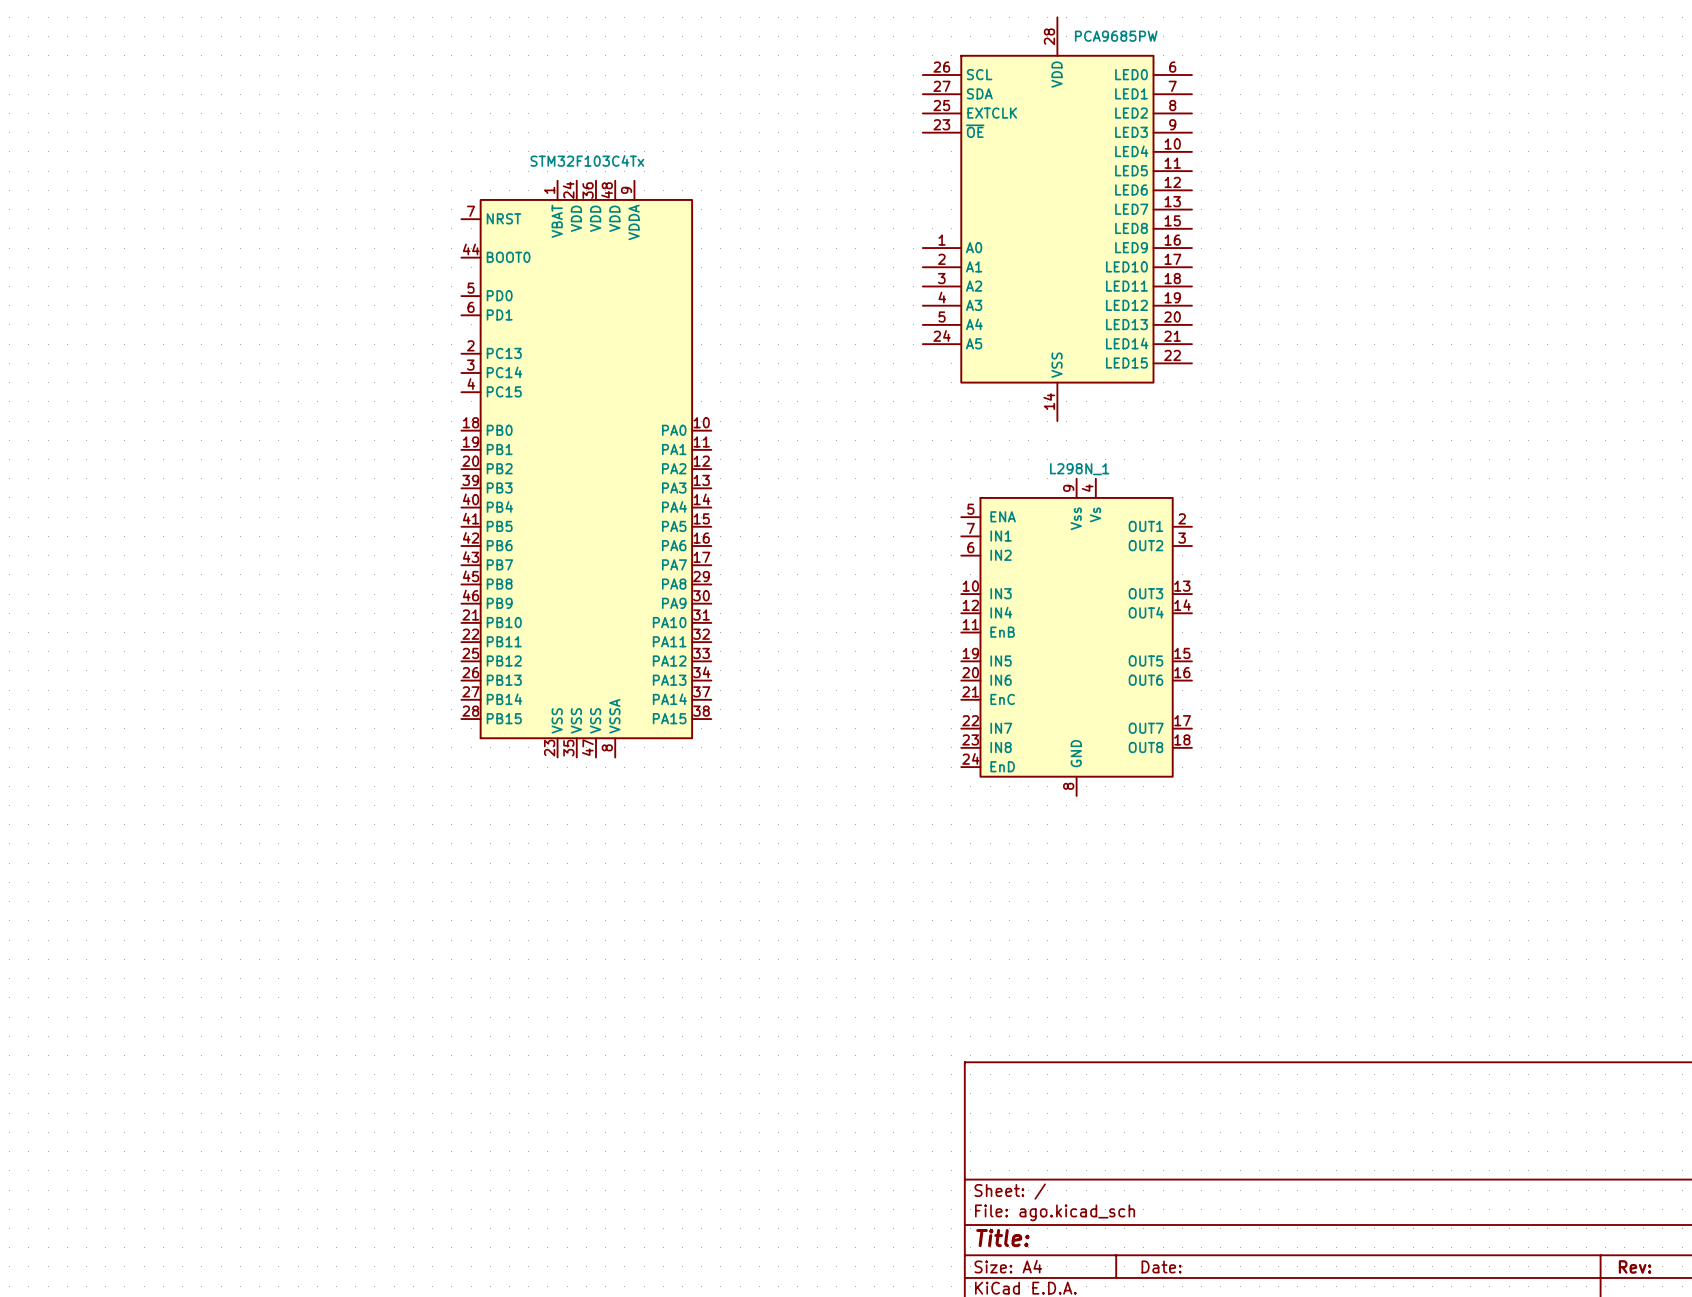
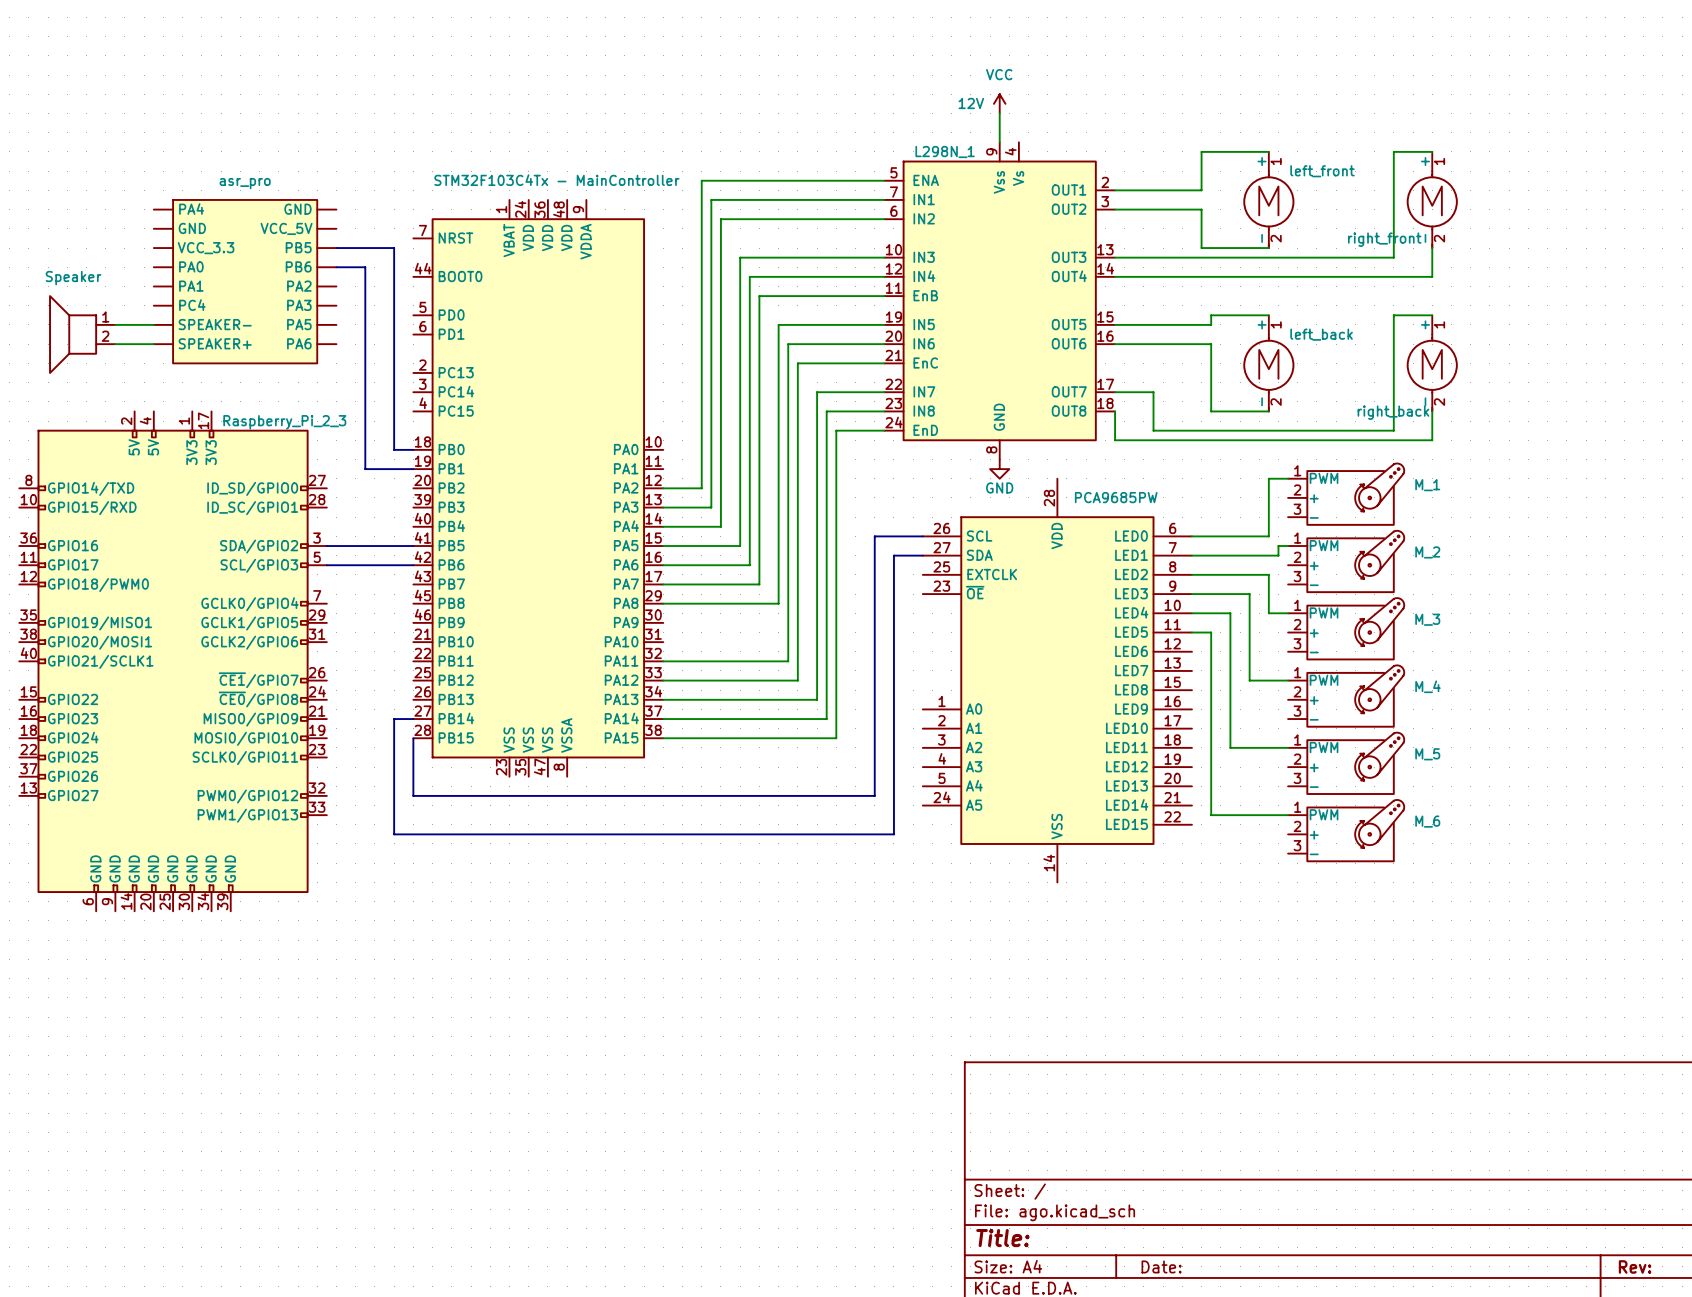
12V: none -> VCC (999, 103)
wire: none -> (1268, 151) (1201, 151) (1201, 190) (1115, 190)
wire: none -> (1432, 151) (1393, 151) (1393, 257) (1115, 257)
wire: none -> (884, 180) (701, 180) (701, 488) (663, 488)
wire: none -> (884, 199) (711, 199) (711, 507) (663, 507)
left_front: none -> (1268, 199)
right_front: none -> (1432, 199)
wire: none -> (1115, 209) (1201, 209) (1201, 248) (1268, 248)
wire: none -> (884, 219) (720, 219) (720, 526) (663, 526)
part: PCA9685PW (1057, 219) -> none
bus: none -> (336, 248) (394, 248) (394, 449) (413, 449)
wire: none -> (1432, 248) (1432, 276) (1115, 276)
wire: none -> (884, 257) (740, 257) (740, 546) (663, 546)
bus: none -> (336, 267) (365, 267) (365, 469) (413, 469)
wire: none -> (884, 276) (749, 276) (749, 565) (663, 565)
part: none -> asr_pro (245, 281)
wire: none -> (884, 296) (759, 296) (759, 584) (663, 584)
part: none -> L298N_1 (999, 300)
wire: none -> (1268, 315) (1211, 315) (1211, 324) (1115, 324)
wire: none -> (1432, 315) (1393, 315) (1393, 430) (1153, 430) (1153, 392) (1115, 392)
wire: none -> (115, 324) (153, 324)
wire: none -> (884, 324) (778, 324) (778, 603) (663, 603)
part: none -> Speaker (82, 334)
wire: none -> (115, 344) (153, 344)
wire: none -> (884, 344) (788, 344) (788, 661) (663, 661)
wire: none -> (1115, 344) (1211, 344) (1211, 411) (1268, 411)
wire: none -> (884, 363) (797, 363) (797, 680) (663, 680)
left_back: none -> (1268, 363)
right_back: none -> (1432, 363)
wire: none -> (884, 392) (817, 392) (817, 699) (663, 699)
wire: none -> (884, 411) (826, 411) (826, 719) (663, 719)
wire: none -> (1115, 411) (1115, 440) (1432, 440) (1432, 411)
wire: none -> (884, 430) (836, 430) (836, 738) (663, 738)
part: STM32F103C4Tx (586, 469) -> none
power symbol: none -> GND (999, 469)
wire: none -> (1288, 478) (1268, 478) (1268, 536) (1191, 536)
part: none -> STM32F103C4Tx - MainController (538, 488)
M_1: none -> (1346, 494)
bus: none -> (922, 536) (874, 536) (874, 795) (413, 795) (413, 738)
bus: none -> (326, 546) (413, 546)
wire: none -> (1288, 546) (1278, 546) (1278, 555) (1191, 555)
bus: none -> (922, 555) (893, 555) (893, 834) (394, 834) (394, 719) (413, 719)
M_2: none -> (1346, 561)
bus: none -> (326, 565) (413, 565)
wire: none -> (1191, 574) (1268, 574) (1268, 613) (1288, 613)
wire: none -> (1191, 594) (1249, 594) (1249, 680) (1288, 680)
wire: none -> (1191, 613) (1230, 613) (1230, 747) (1288, 747)
M_3: none -> (1346, 629)
wire: none -> (1191, 632) (1211, 632) (1211, 815) (1288, 815)
part: L298N_1 (1076, 637) -> none
part: none -> Raspberry_Pi_2_3 (173, 661)
part: none -> PCA9685PW (1057, 680)
M_4: none -> (1346, 696)
M_5: none -> (1346, 763)
M_6: none -> (1346, 831)

